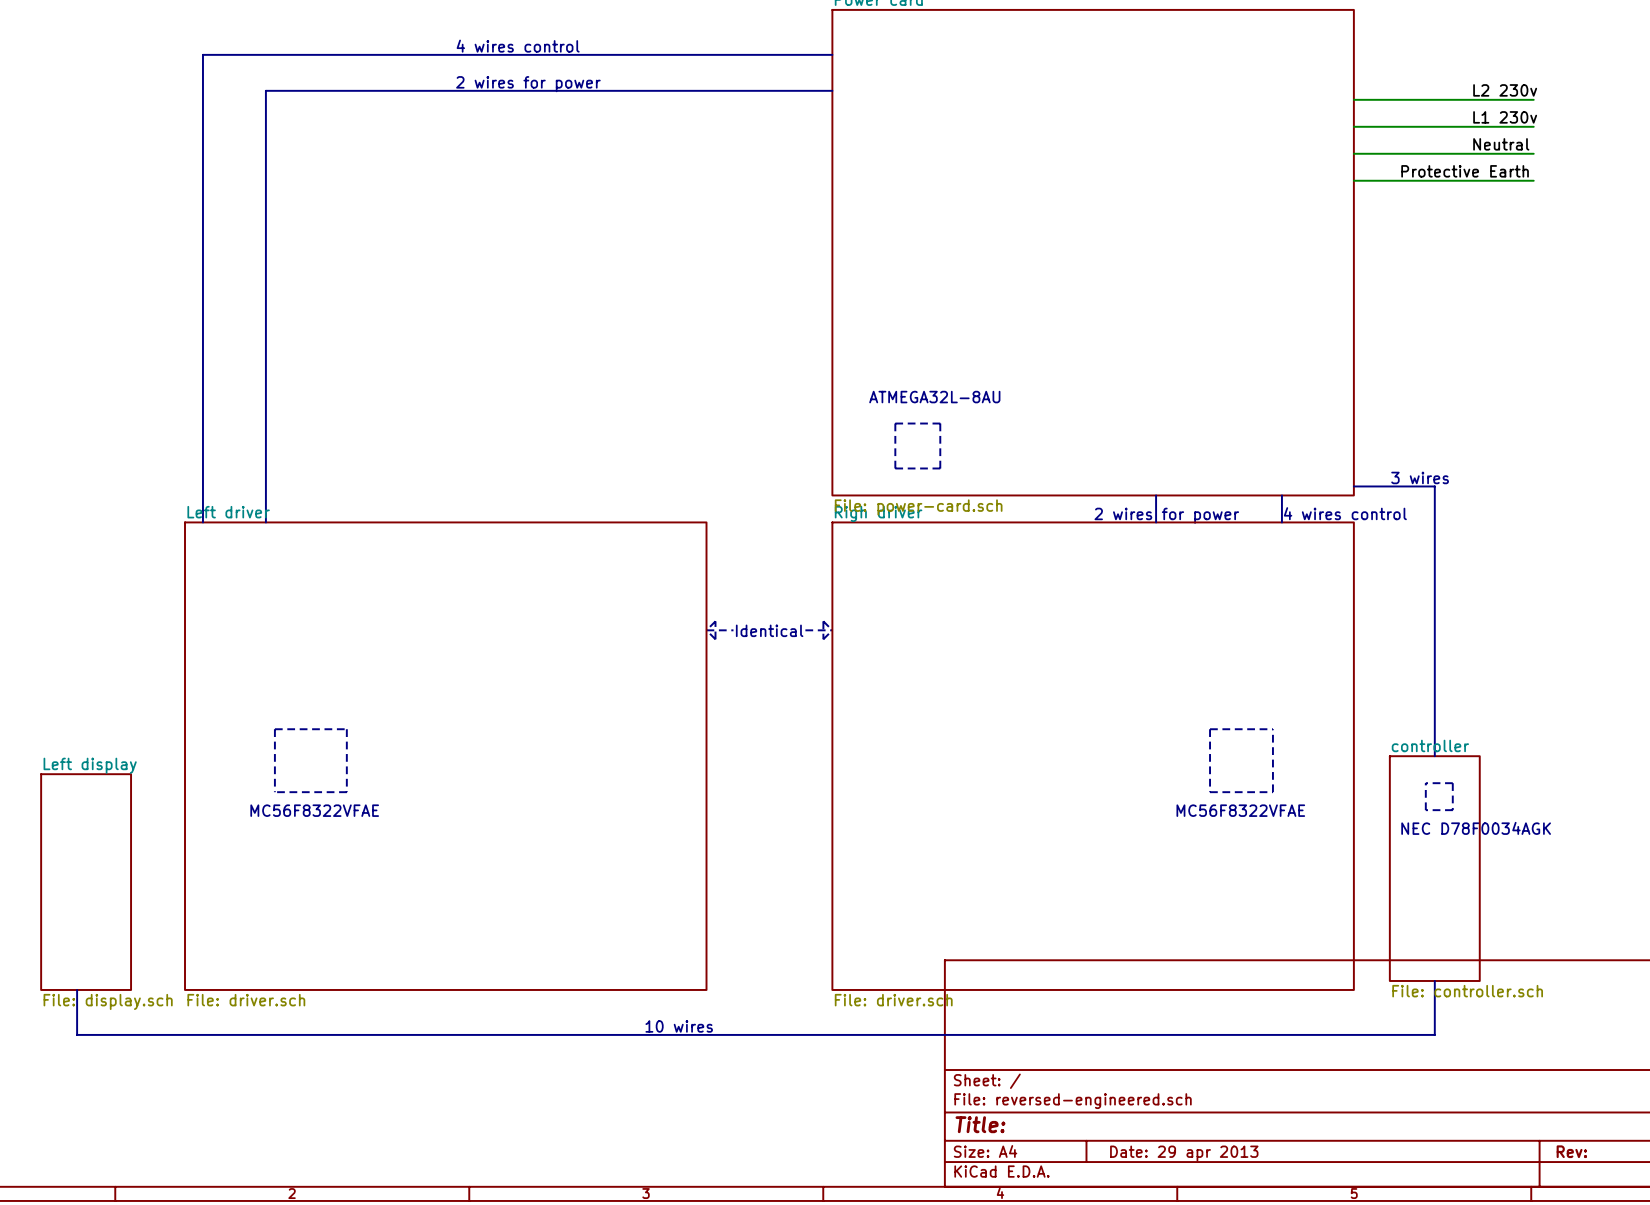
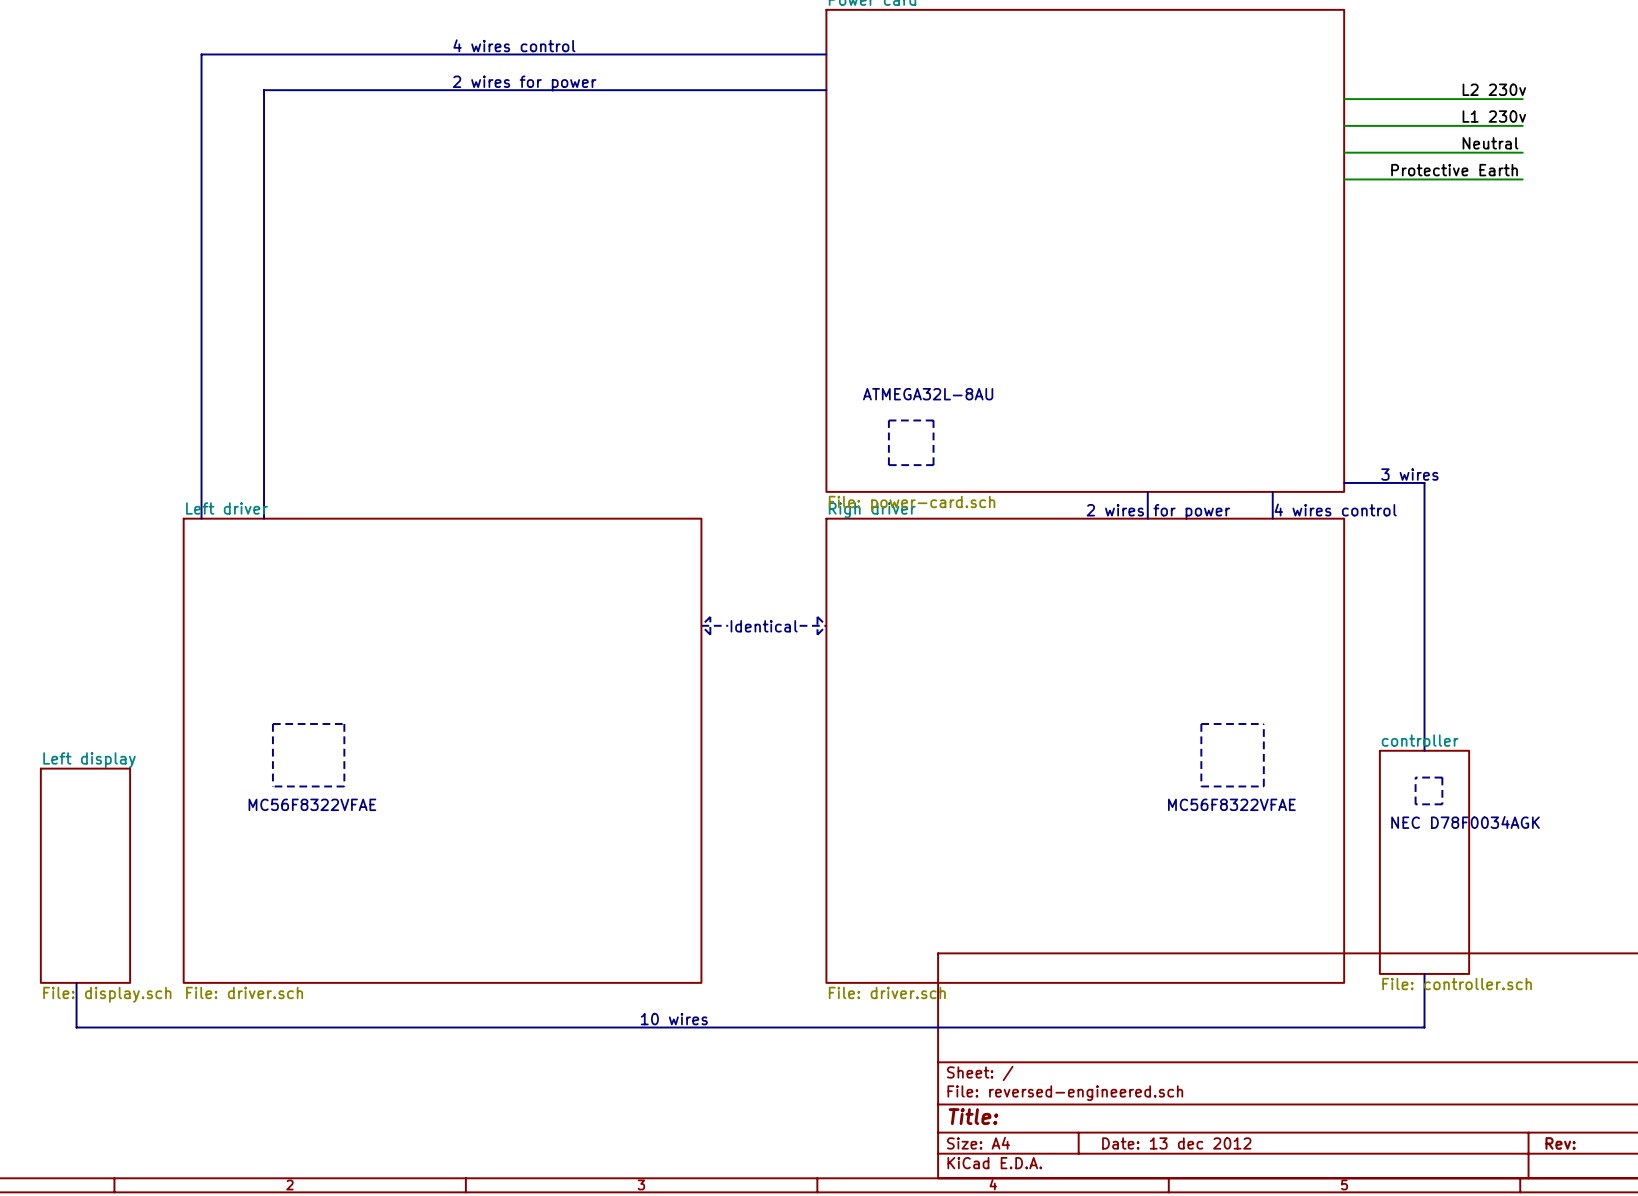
title block: Date: 29 apr 2013 (1184, 1153) -> Date: 13 dec 2012 (1176, 1143)

